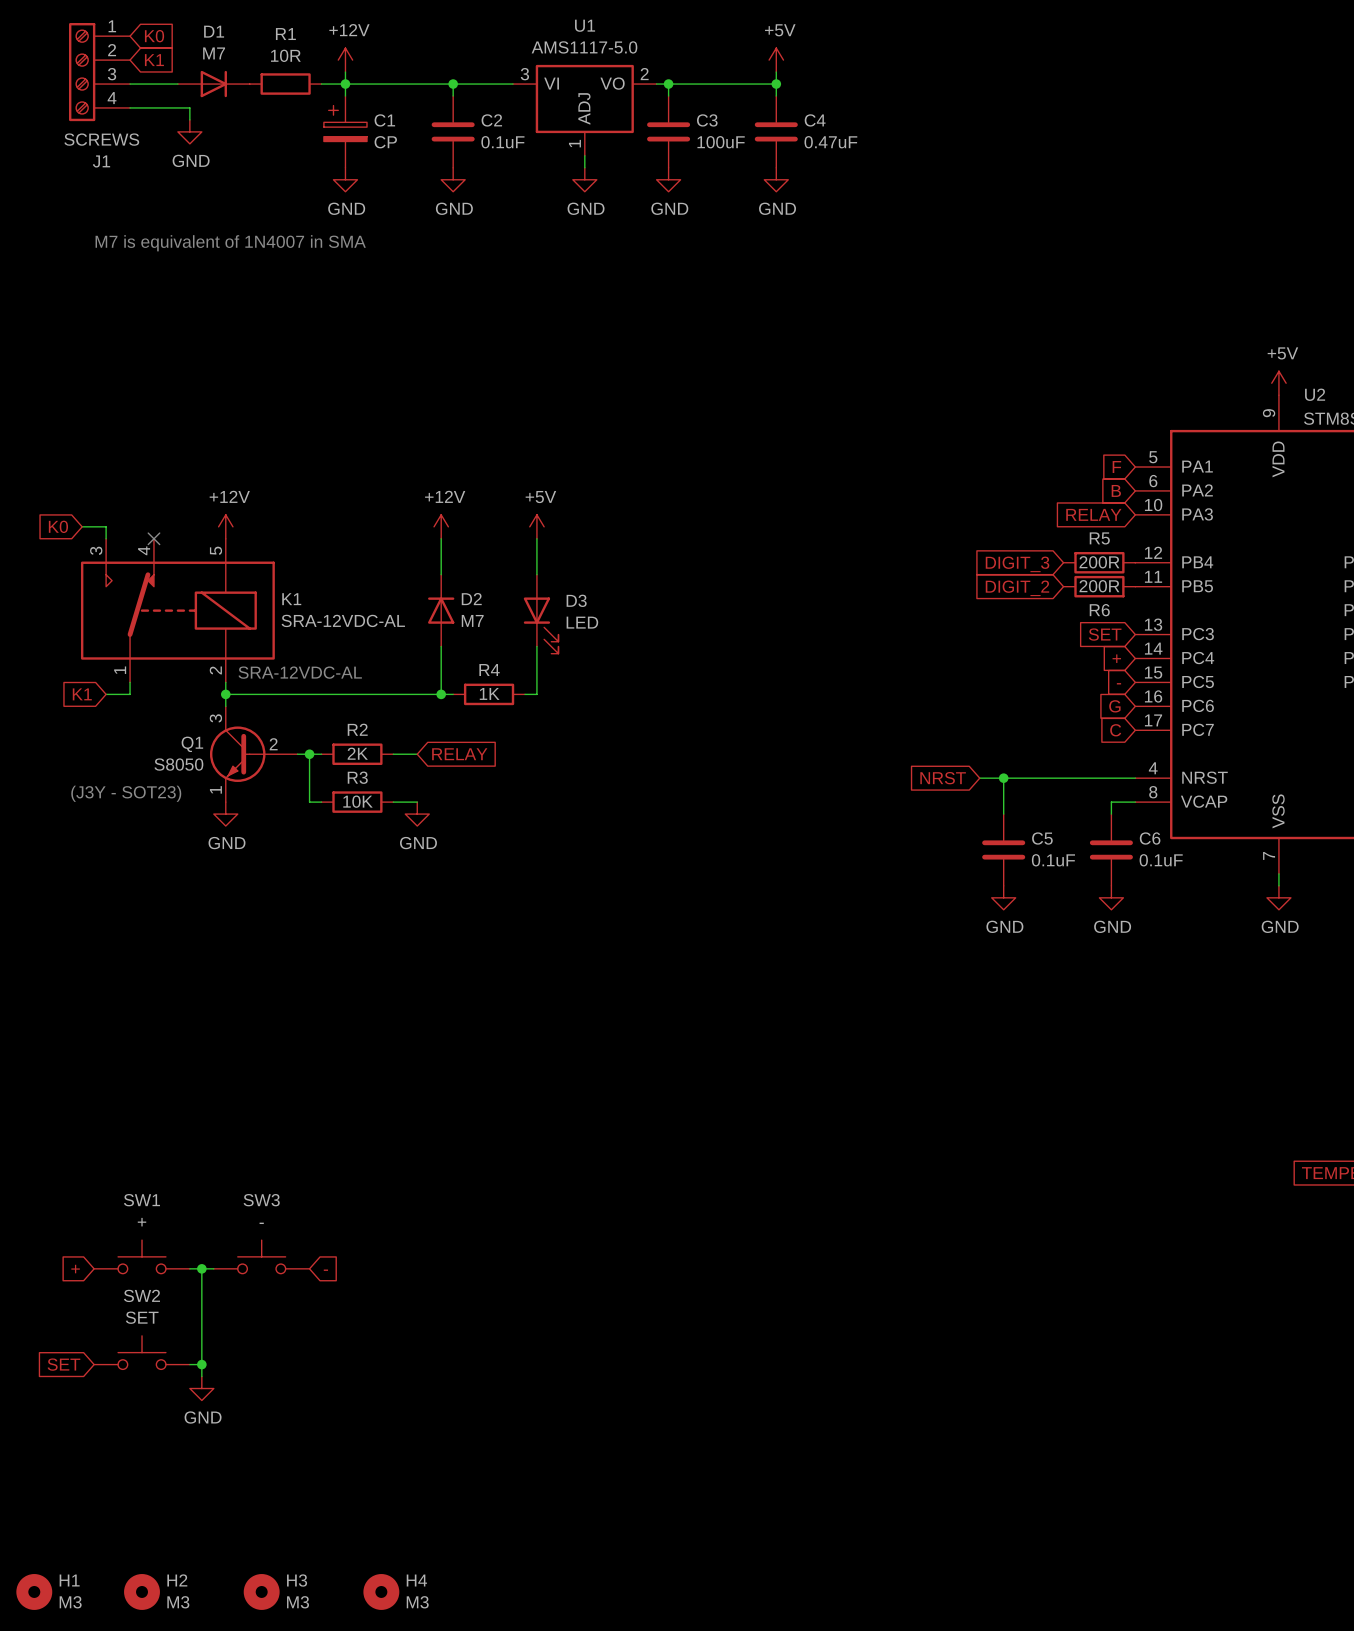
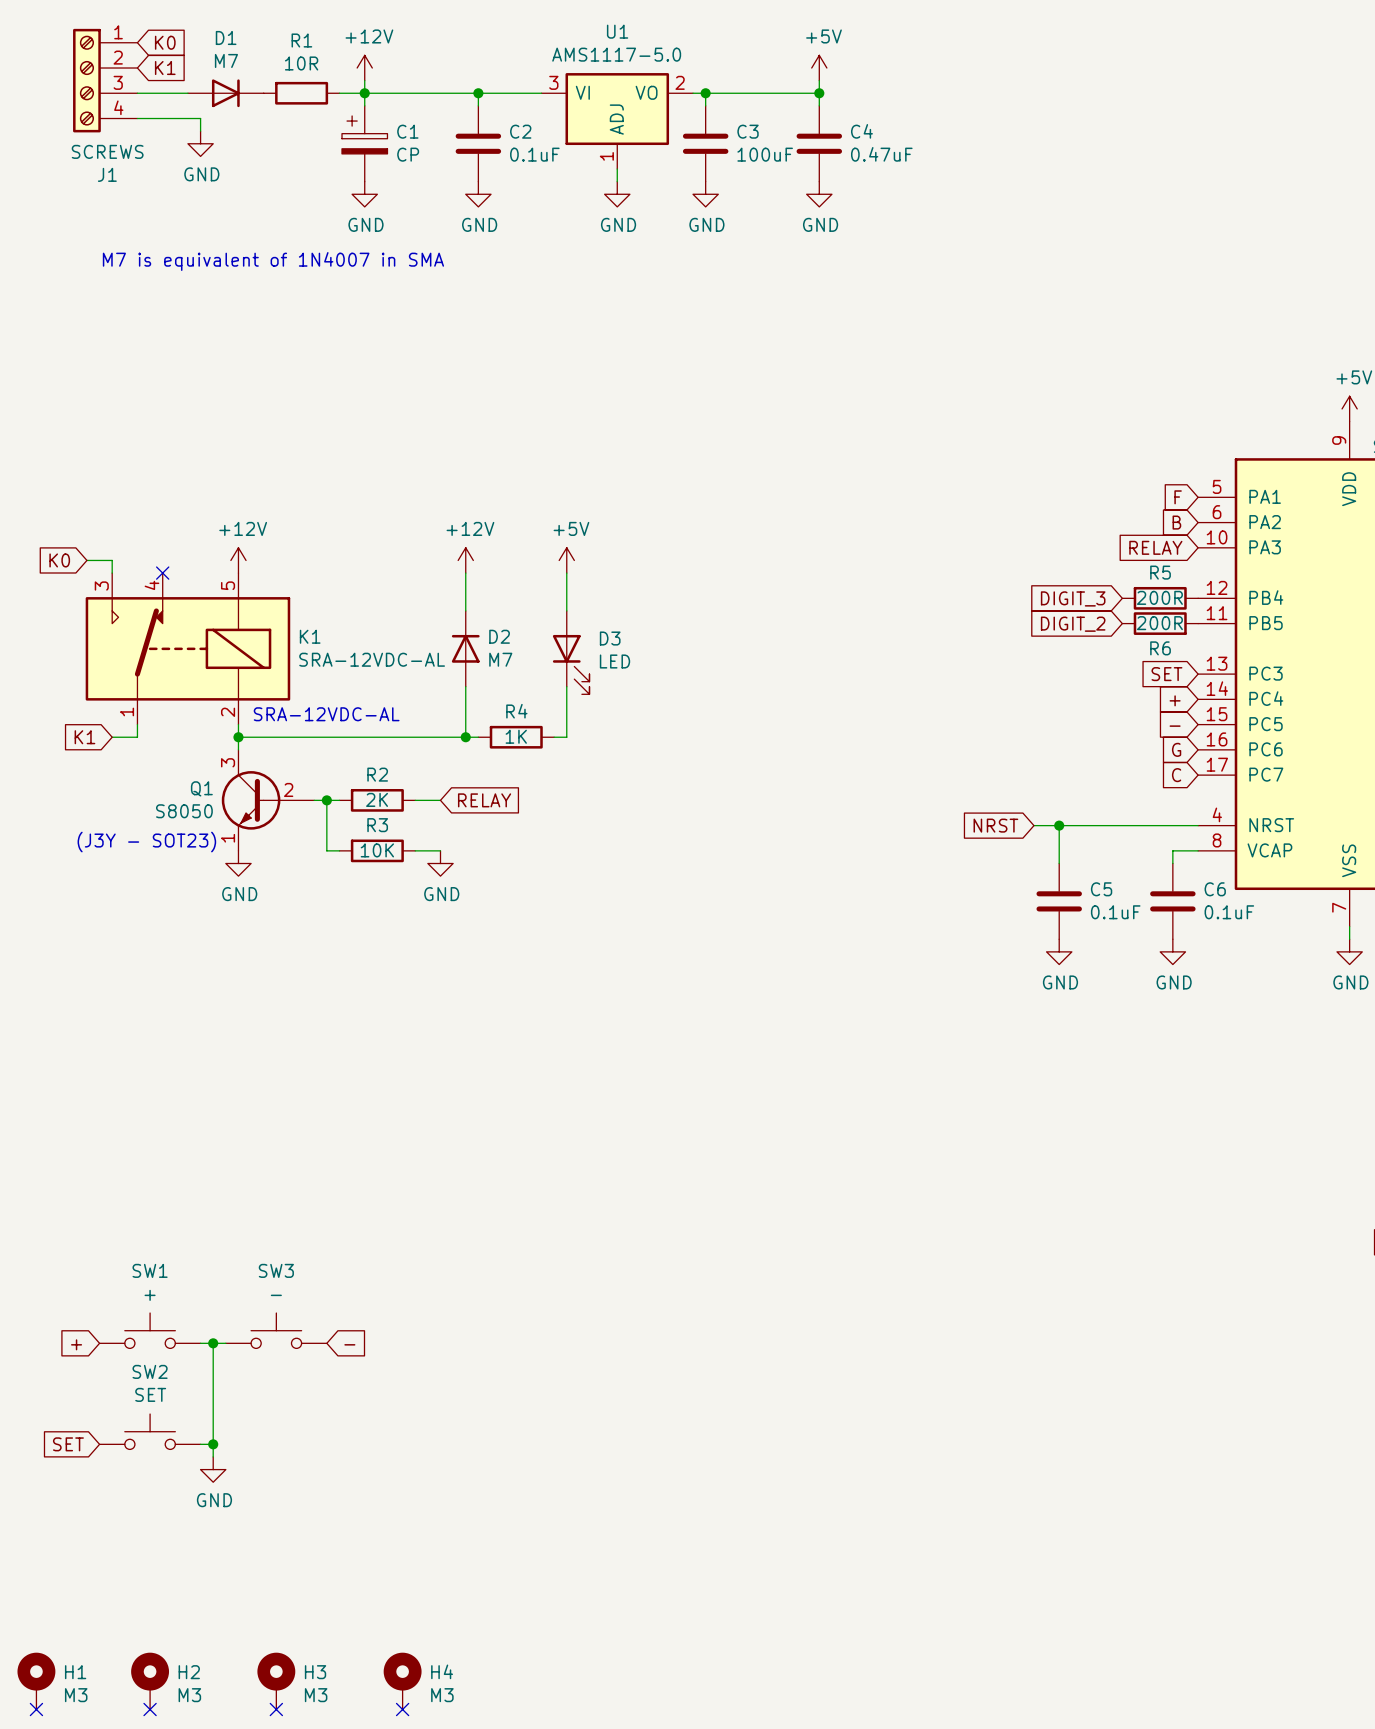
H1 symbol: [16, 1574, 53, 1610] -> [17, 1652, 56, 1710]
H2 symbol: [124, 1574, 160, 1610] -> [131, 1652, 170, 1710]
H3 symbol: [243, 1574, 280, 1610] -> [257, 1652, 296, 1710]
H4 symbol: [363, 1574, 400, 1610] -> [383, 1652, 422, 1710]
no-connect mark: none -> (36, 1709)
no-connect mark: none -> (150, 1709)
no-connect mark: none -> (276, 1709)
no-connect mark: none -> (402, 1709)

